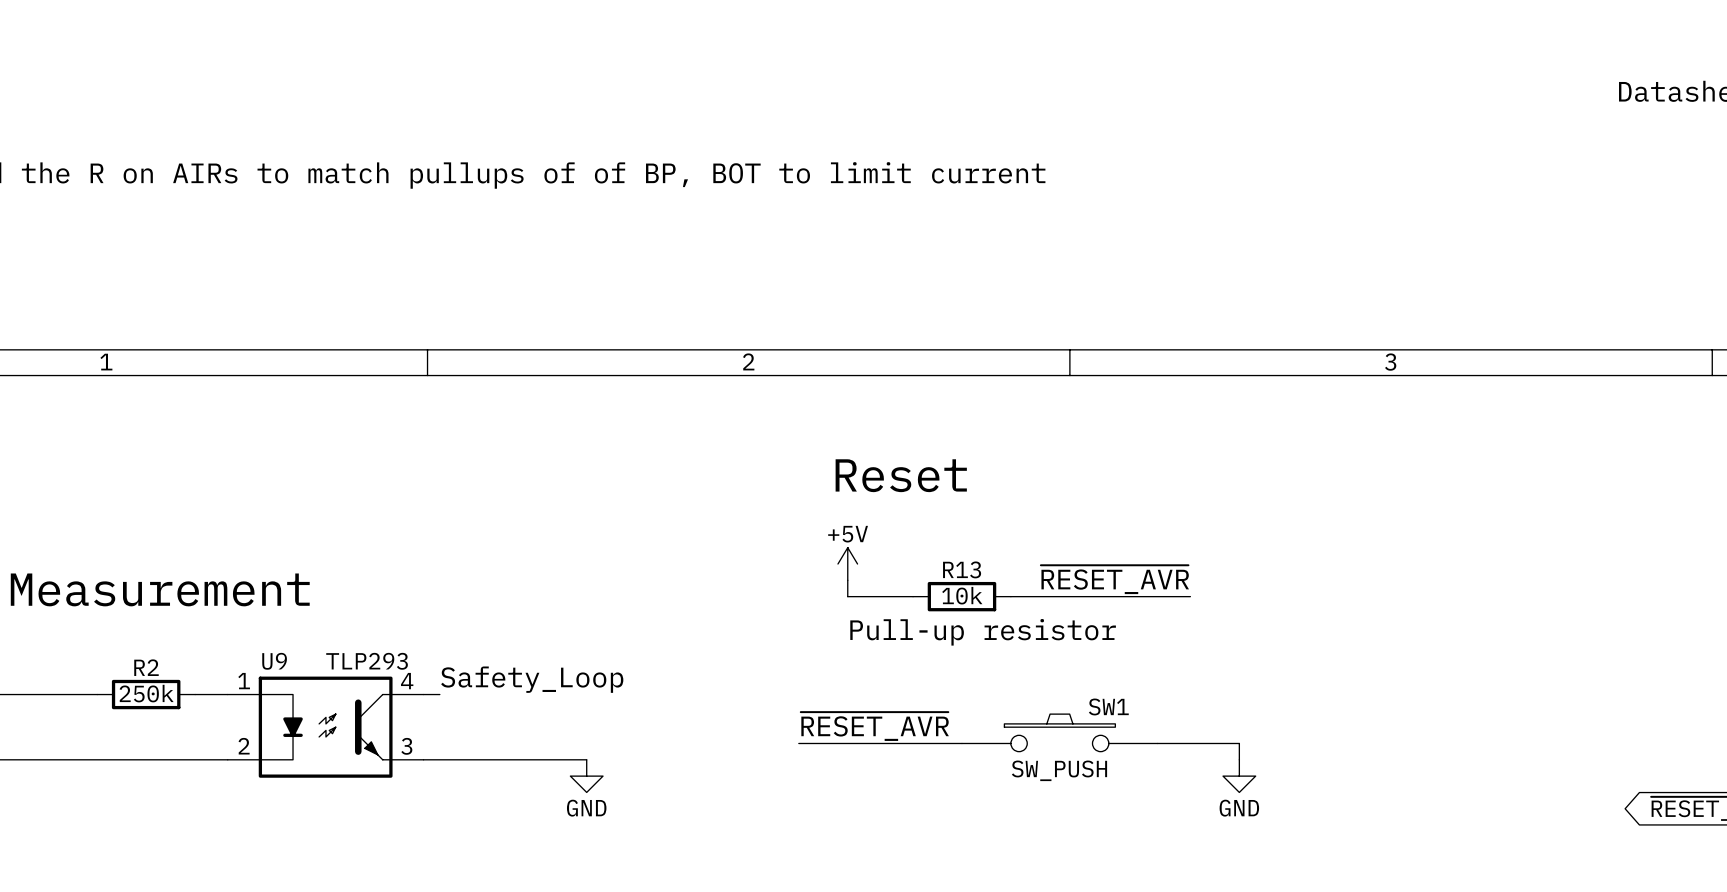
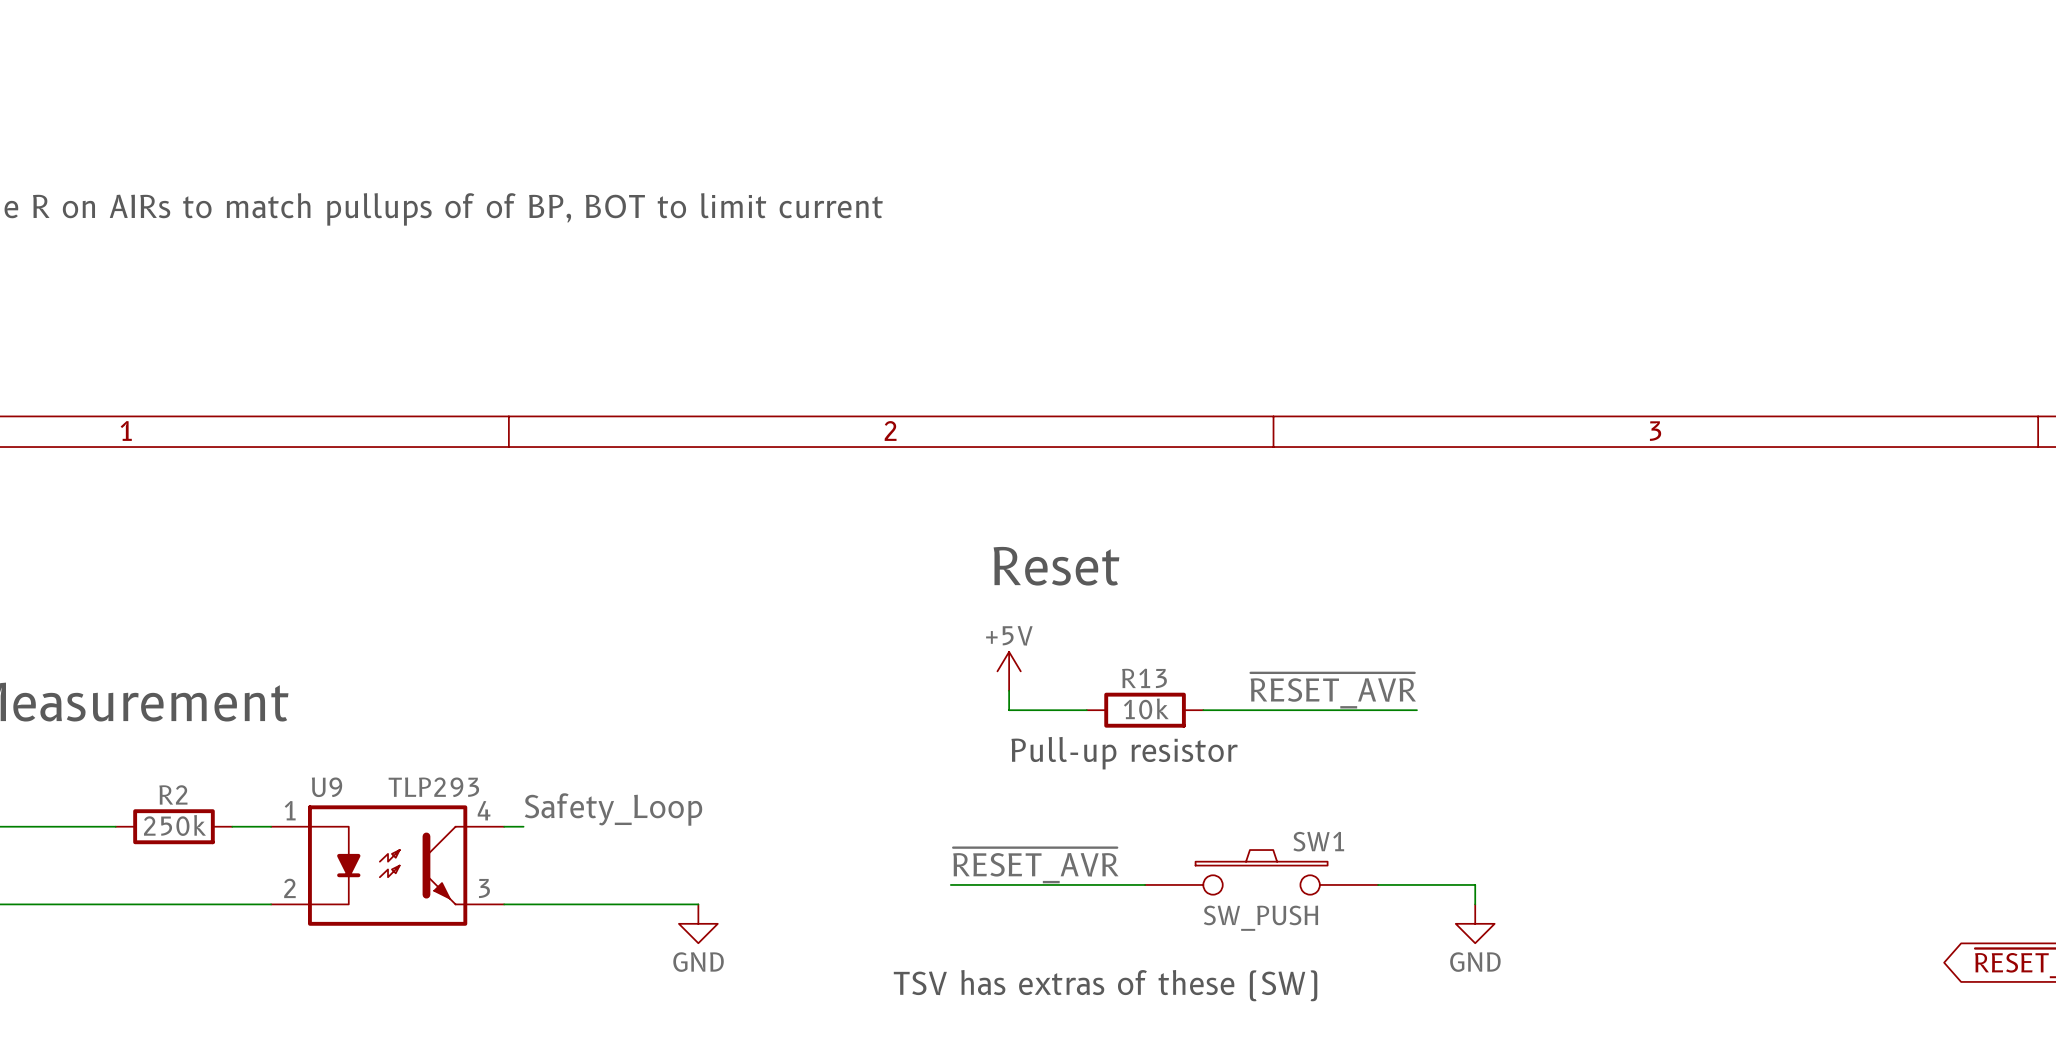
text: none -> TSV has extras of these (SW) (1105, 985)

